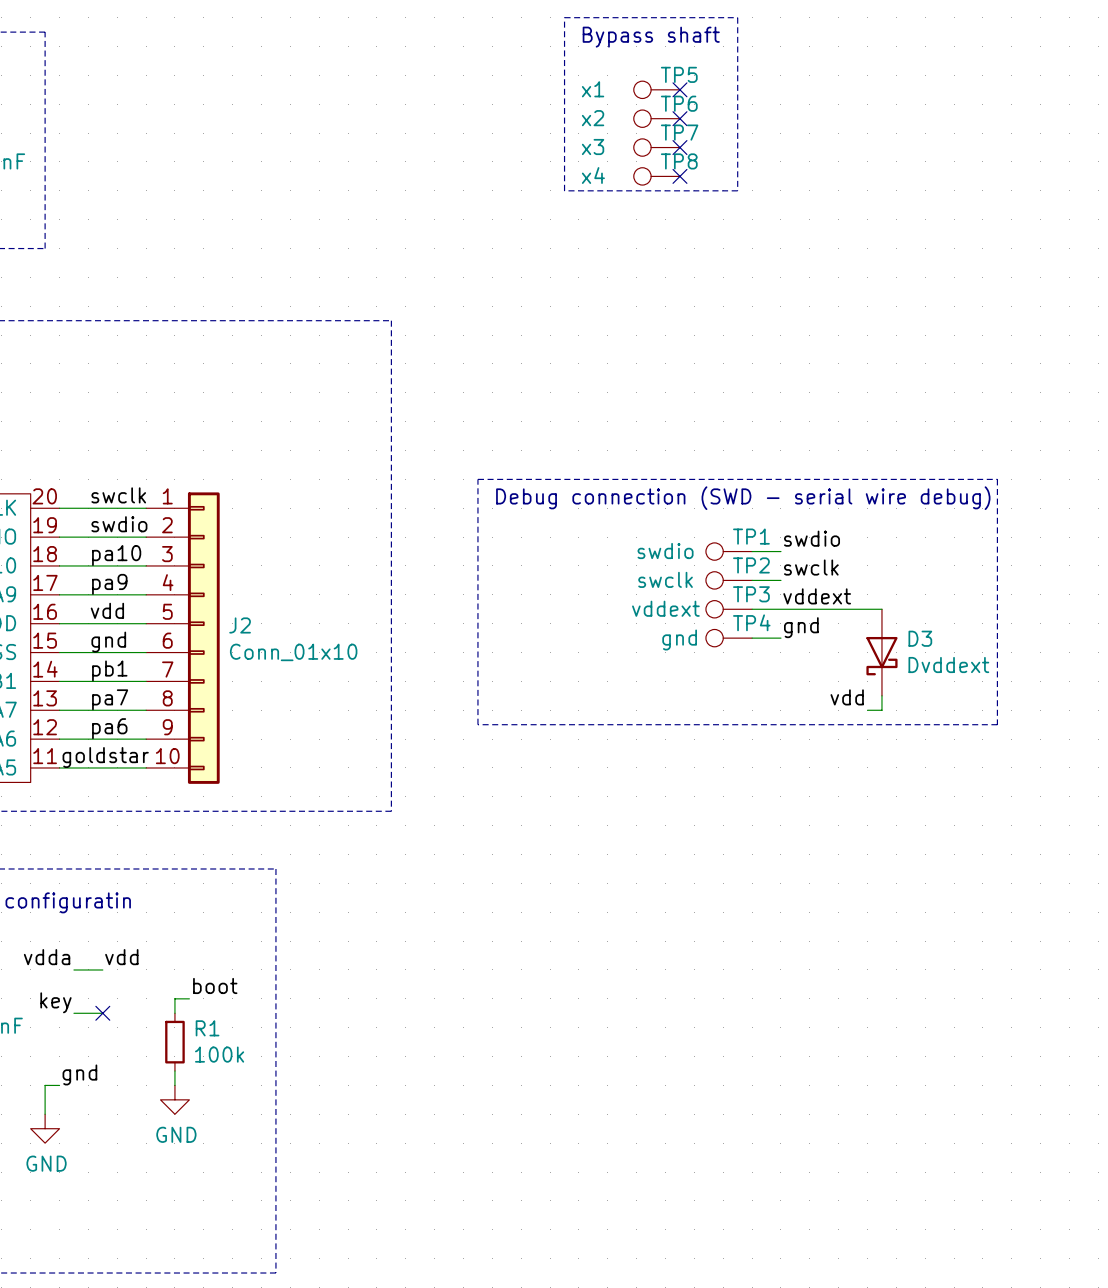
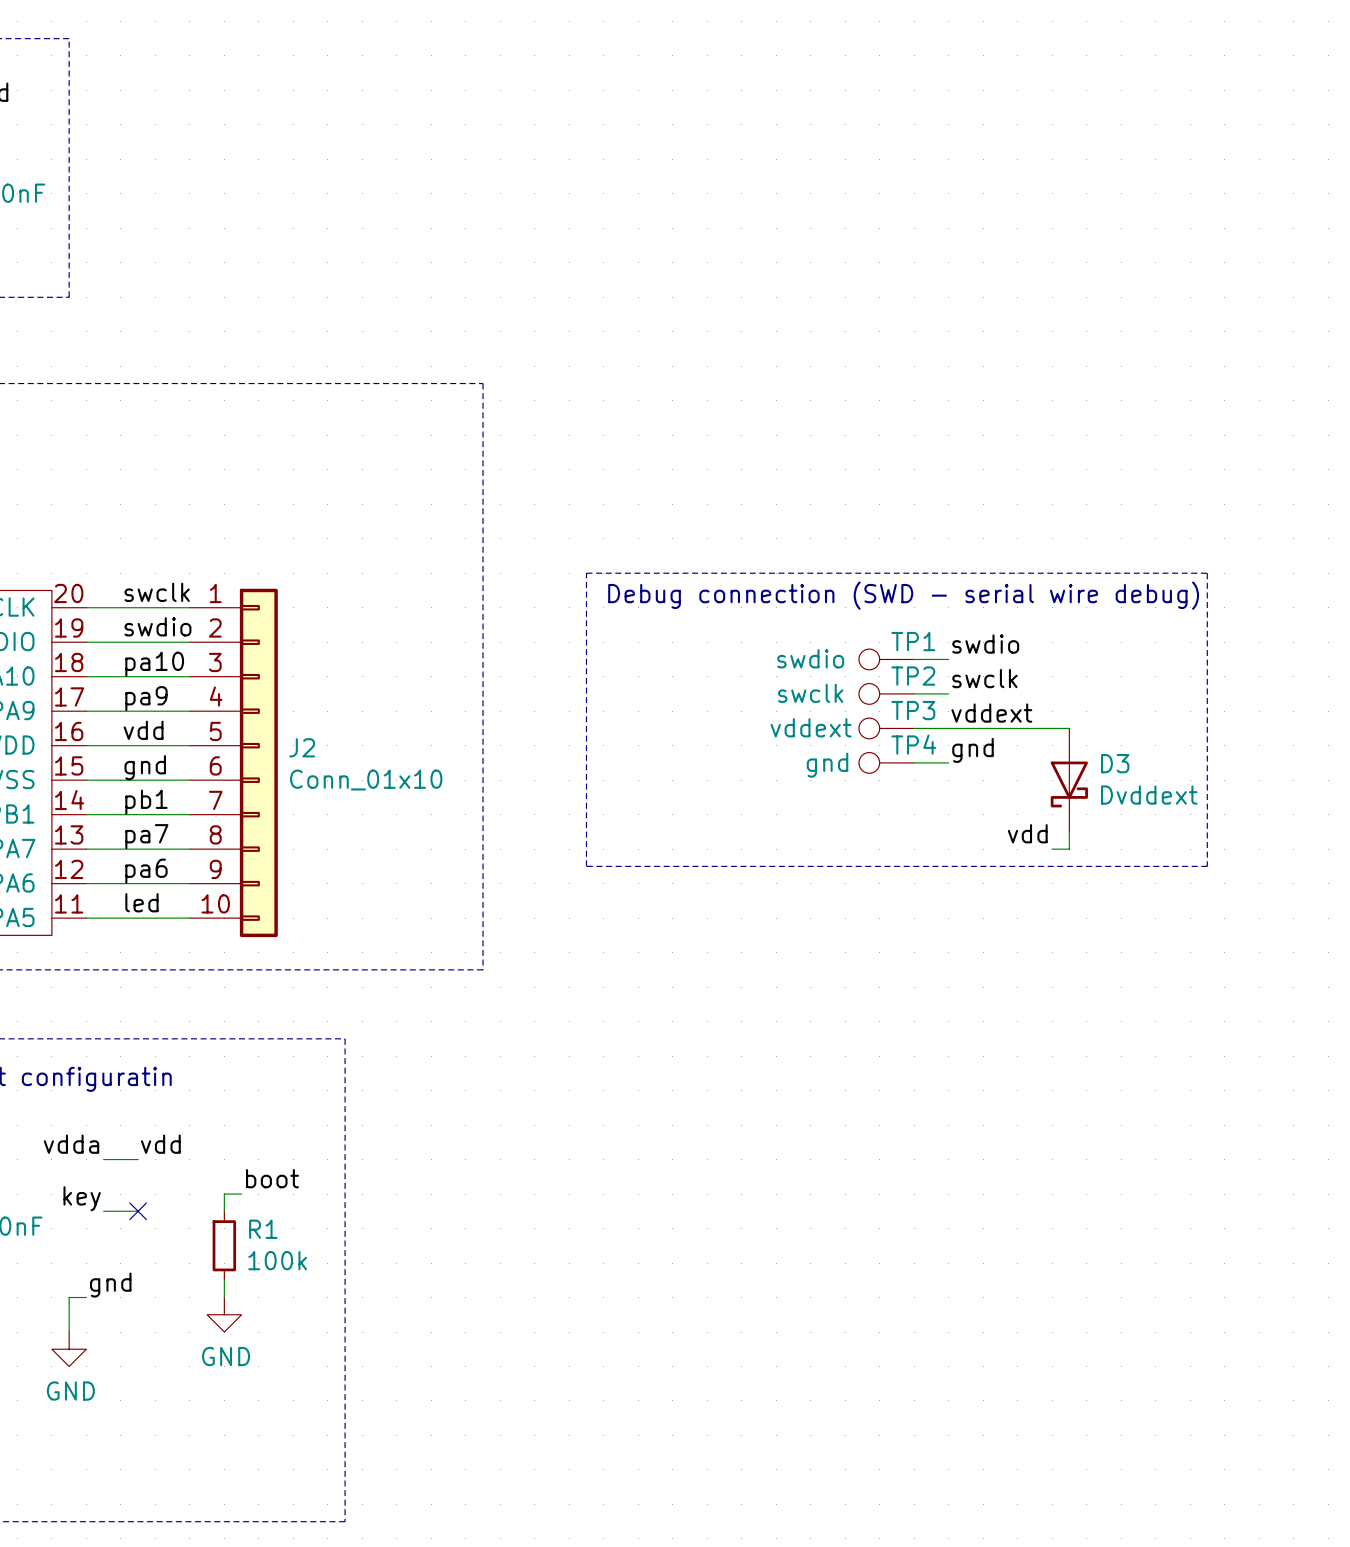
line: (564, 17) (737, 17) (737, 190) (564, 190) (564, 17) -> none
text: Bypass shaft (651, 37) -> none
TP5: x1 (656, 89) -> none
no-connect mark: (679, 89) -> none
TP6: x2 (656, 118) -> none
no-connect mark: (679, 118) -> none
TP7: x3 (656, 147) -> none
no-connect mark: (679, 147) -> none
TP8: x4 (656, 176) -> none
no-connect mark: (679, 176) -> none
label: none -> led (141, 902)
label: goldstar (105, 757) -> none

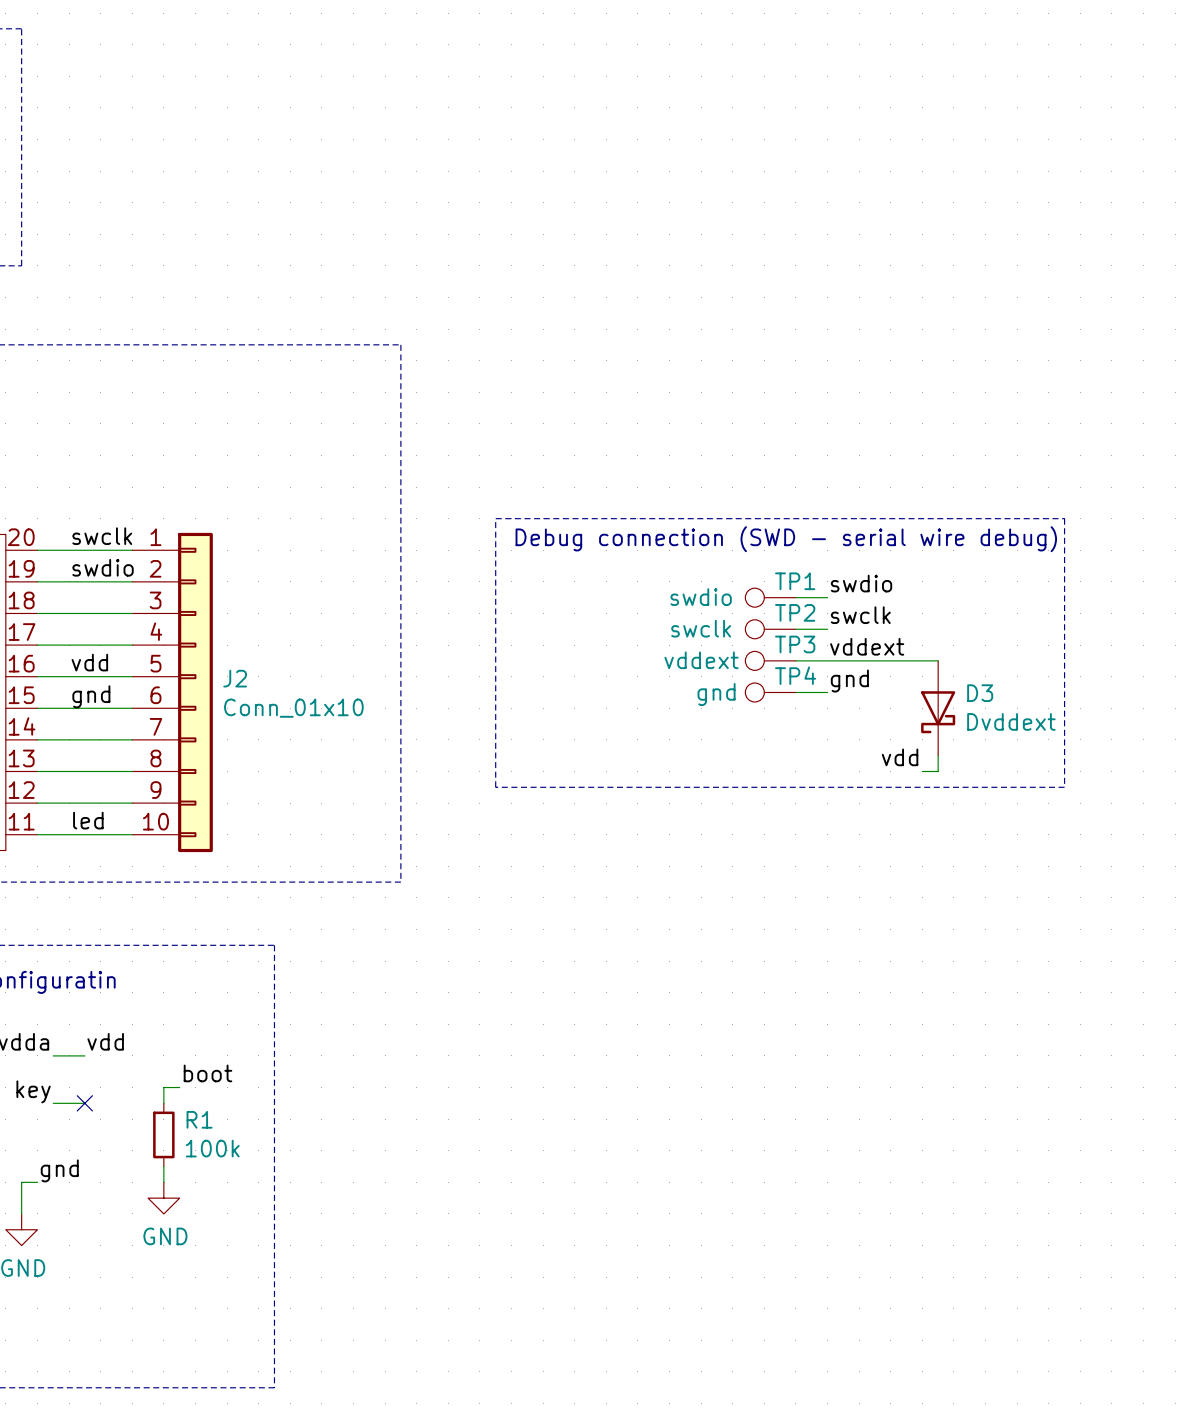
label: pa10 (154, 664) -> none
label: pa9 (146, 698) -> none
label: pb1 (146, 802) -> none
label: pa7 (146, 836) -> none
label: pa6 (146, 871) -> none

